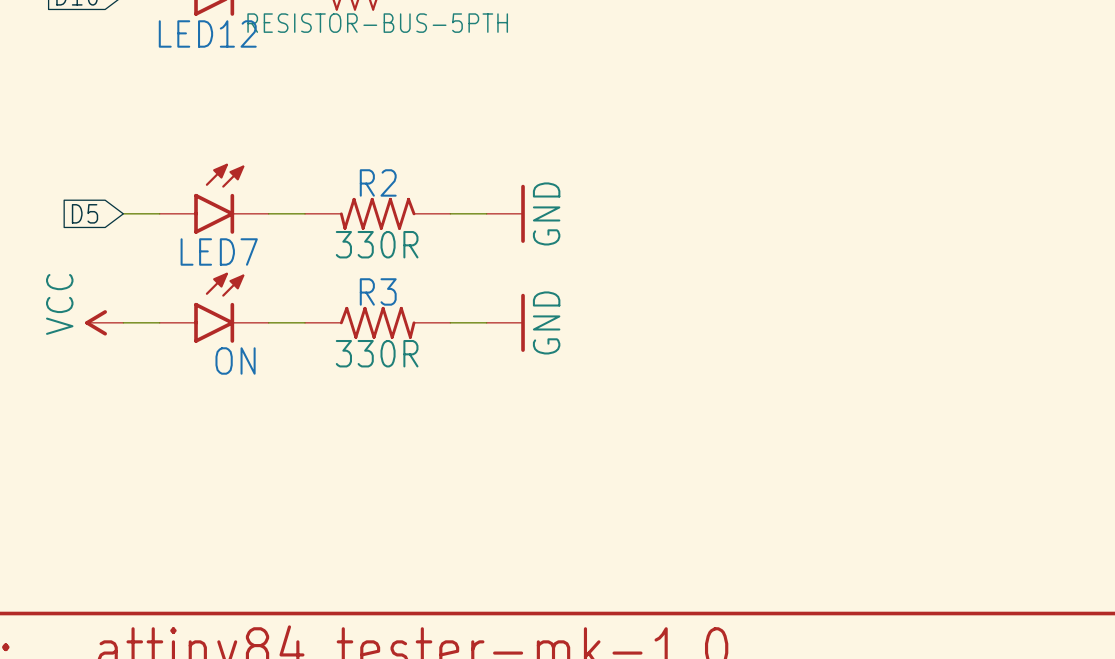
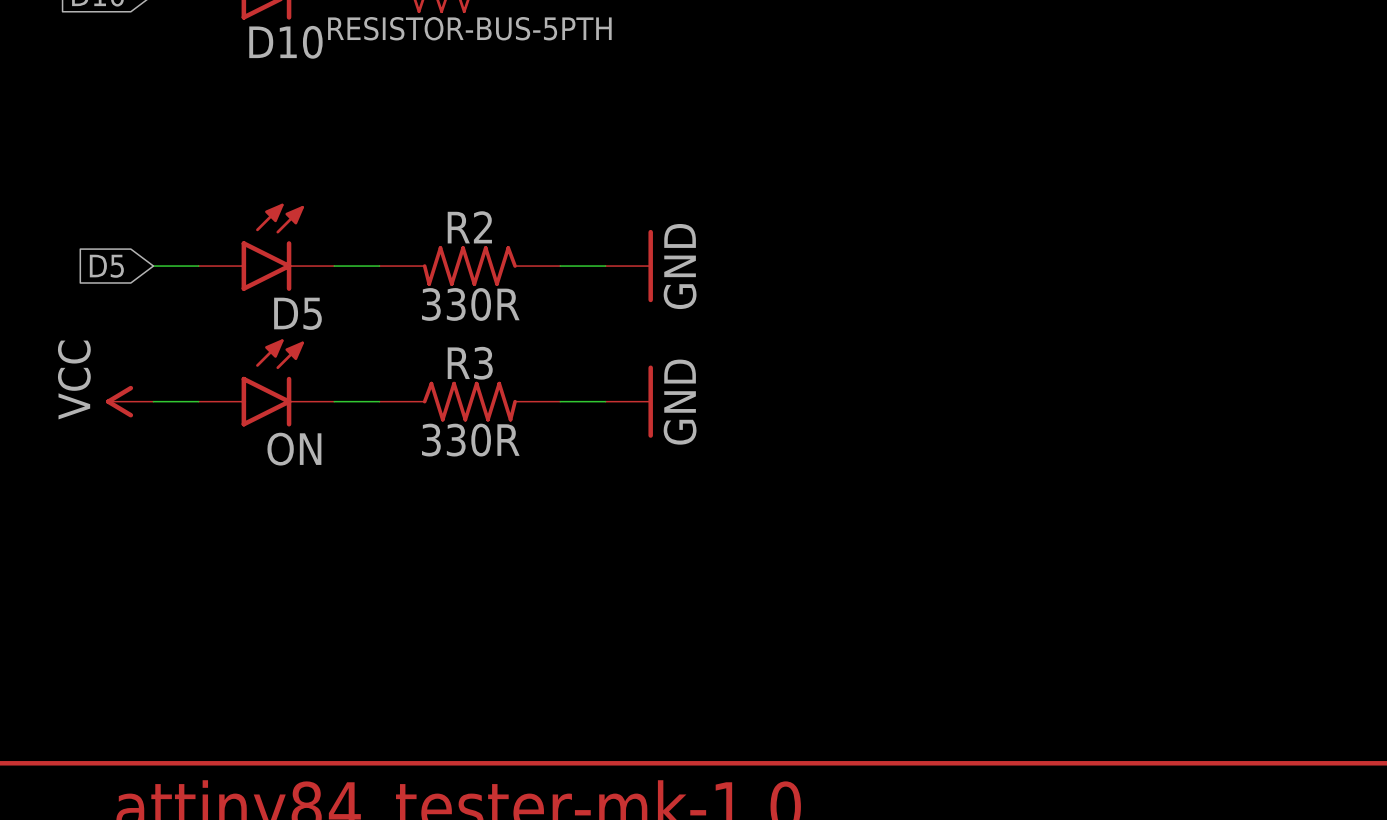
LED12 name: LED12 (207, 33) -> D10 (285, 42)
LED7 name: LED7 (219, 251) -> D5 (297, 313)

